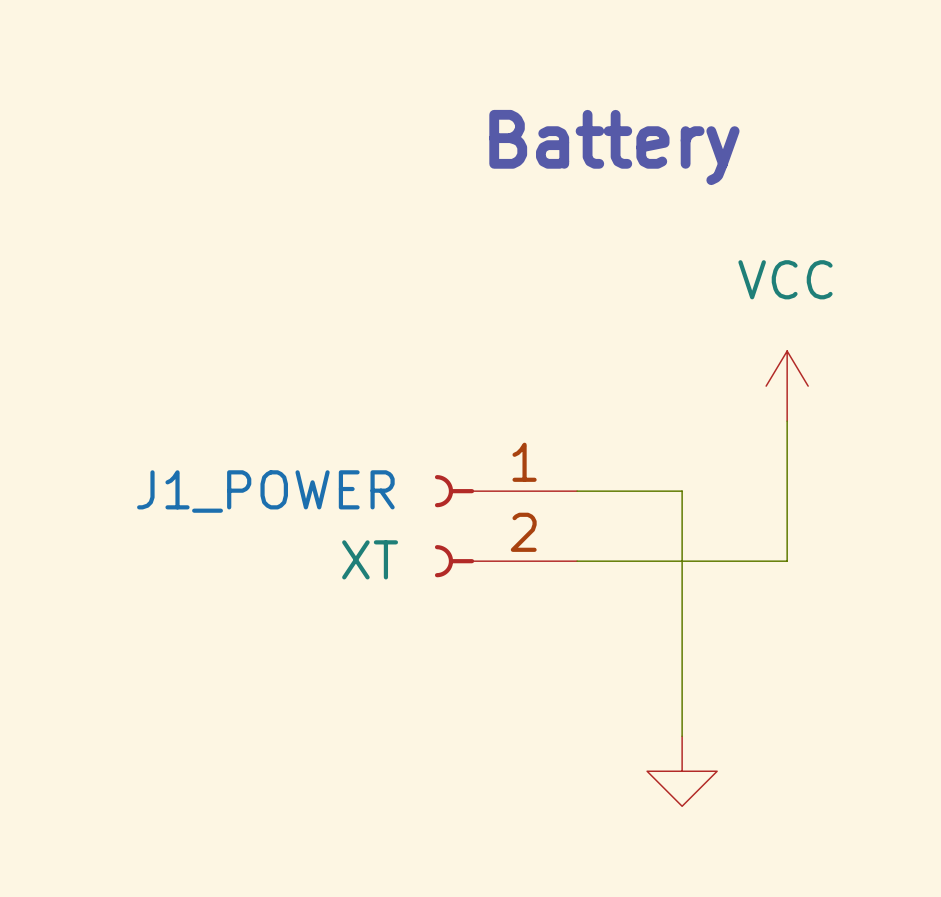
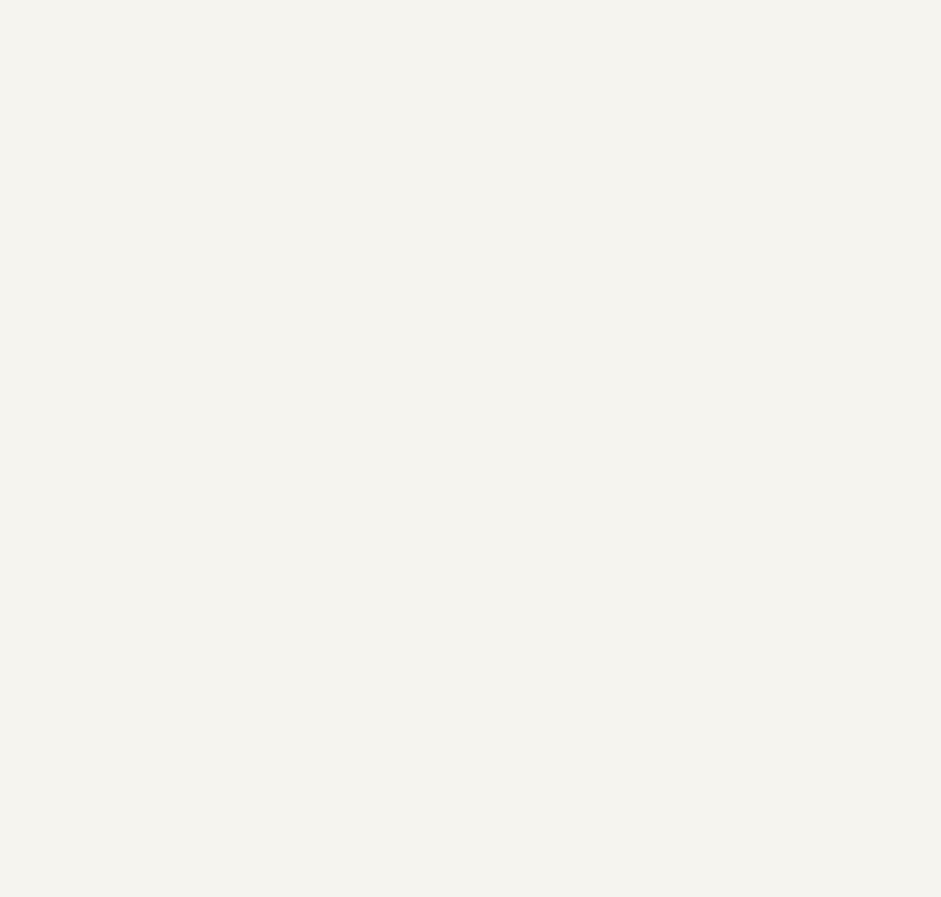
text: Battery (614, 147) -> none
power symbol: VCC (787, 386) -> none
wire: (787, 421) (787, 561) (577, 561) -> none
wire: (577, 491) (682, 491) (682, 736) -> none
J1_POWER: XT (506, 526) -> none
power symbol: (682, 771) -> none

